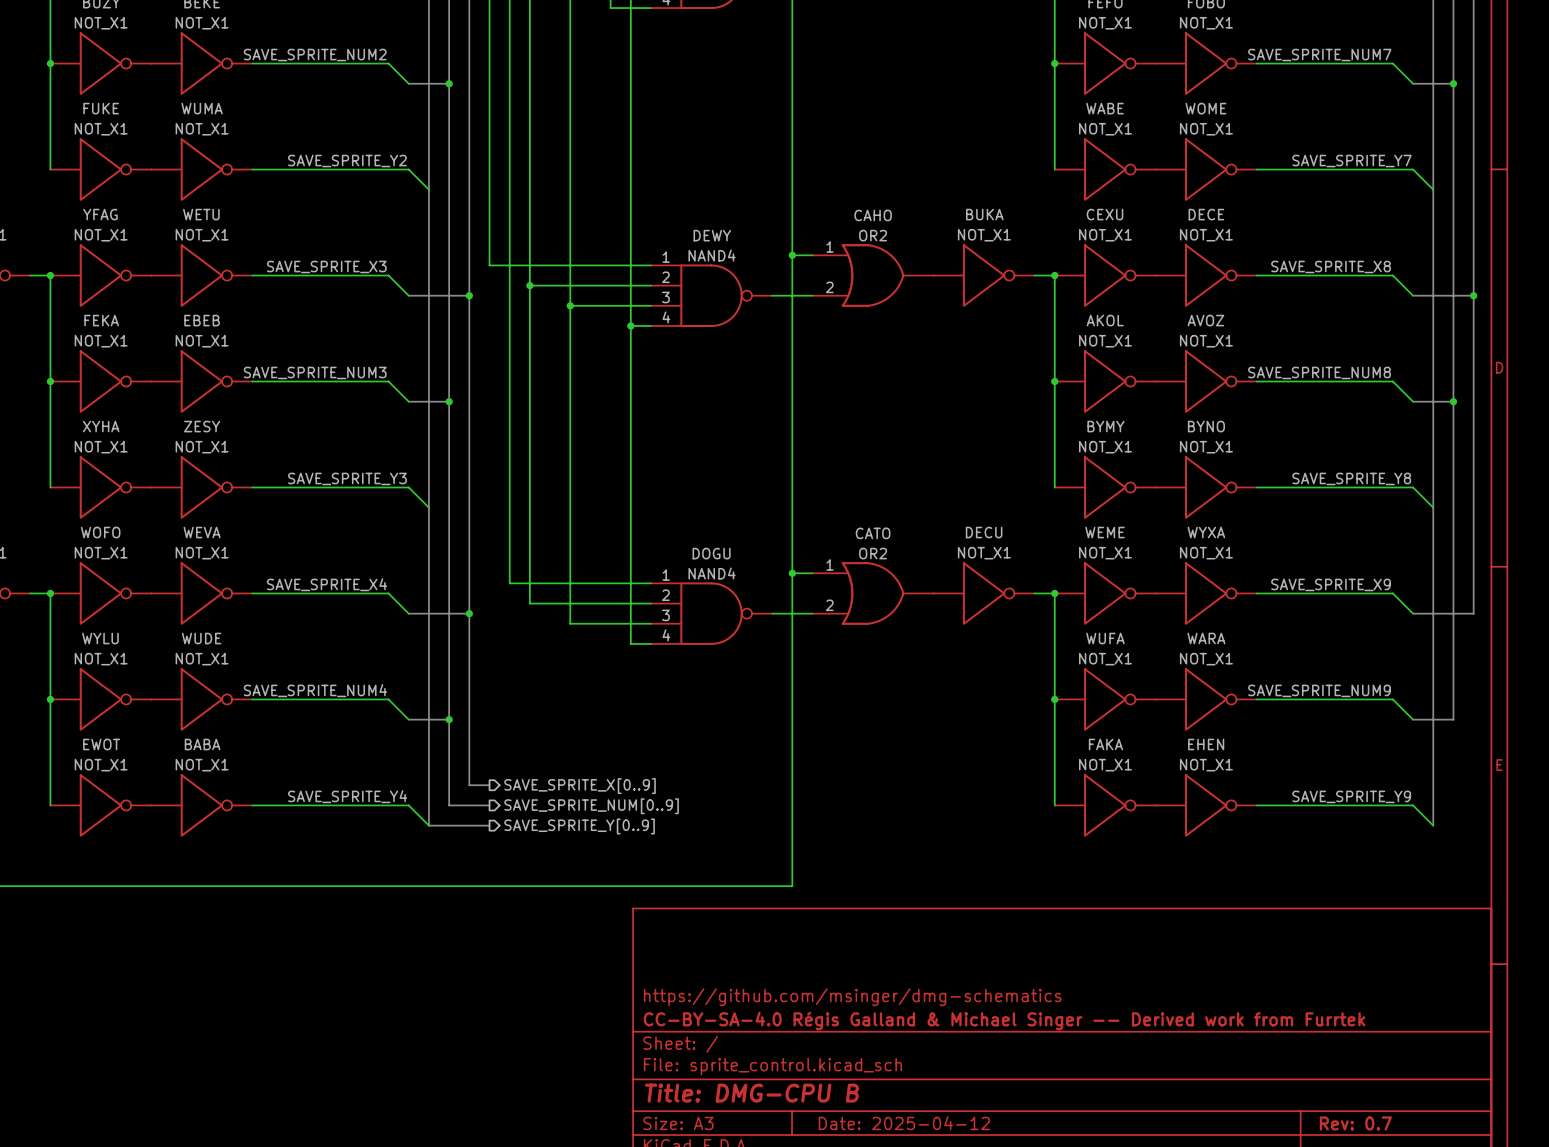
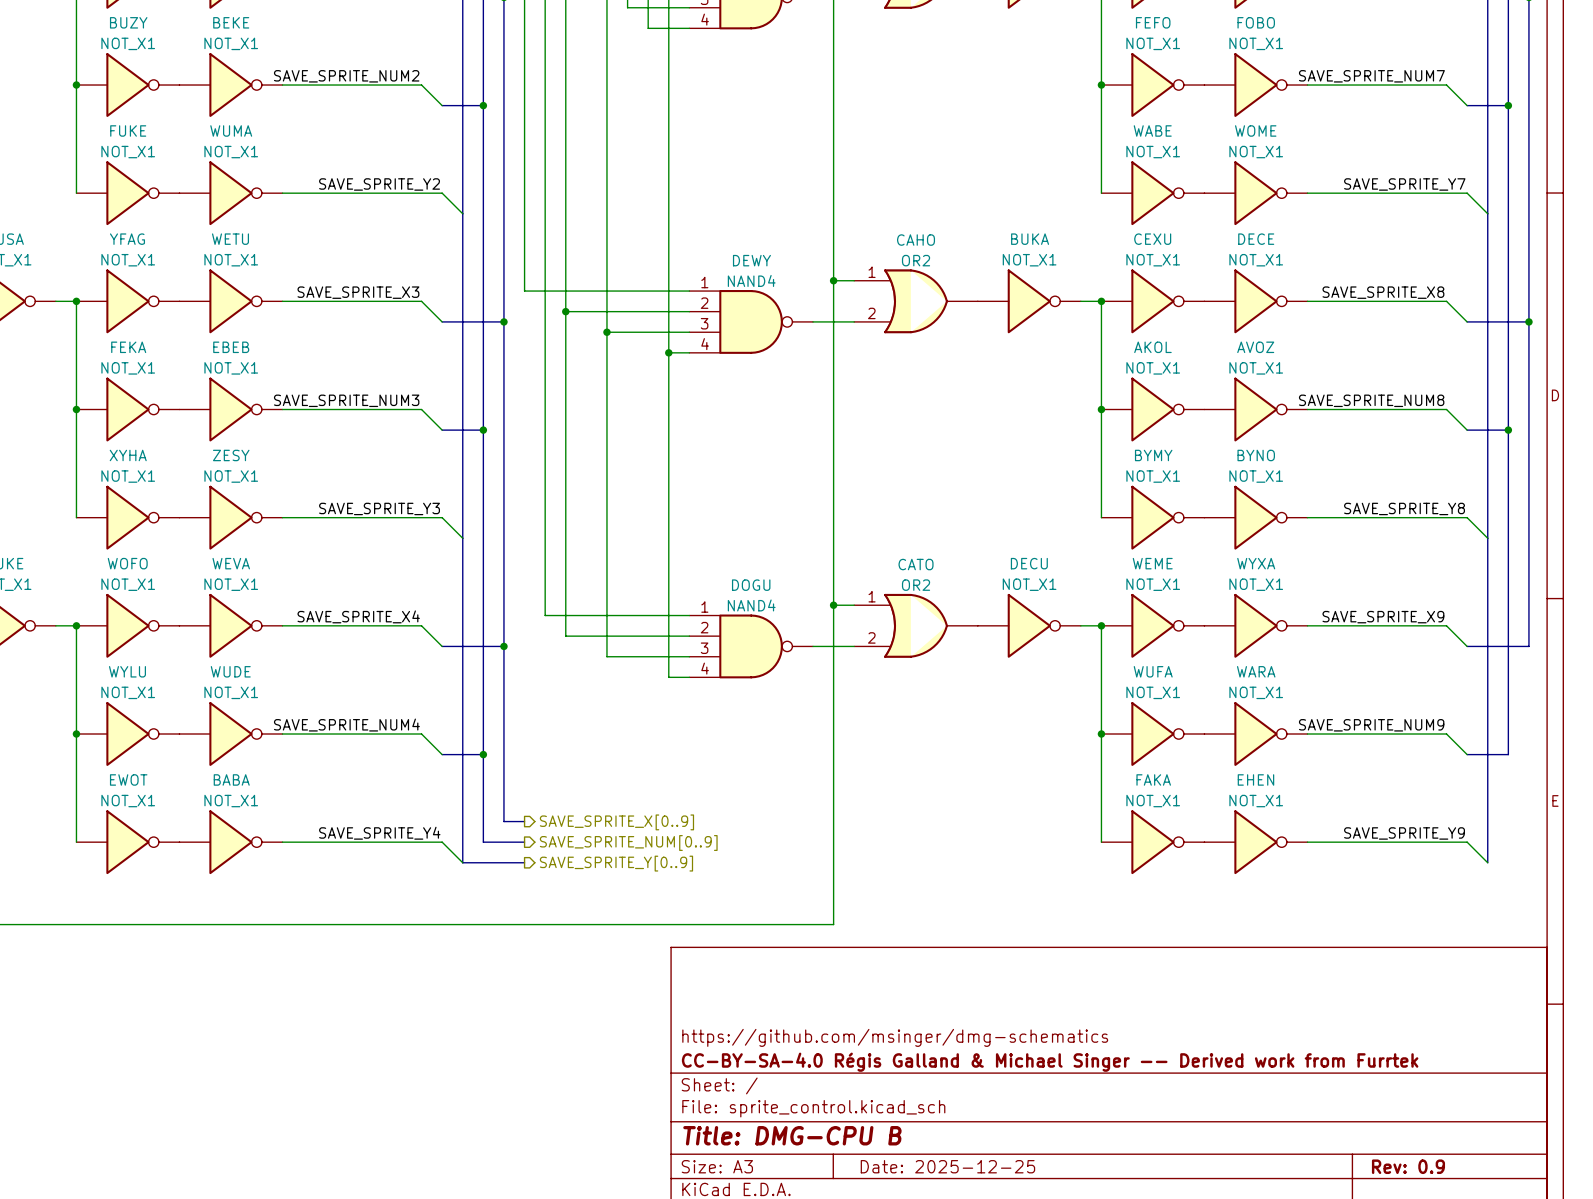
title block: Date: 2025-04-12 (904, 1123) -> Date: 2025-12-25 (947, 1166)
title block: Rev: 0.7 (1355, 1123) -> Rev: 0.9 (1408, 1166)

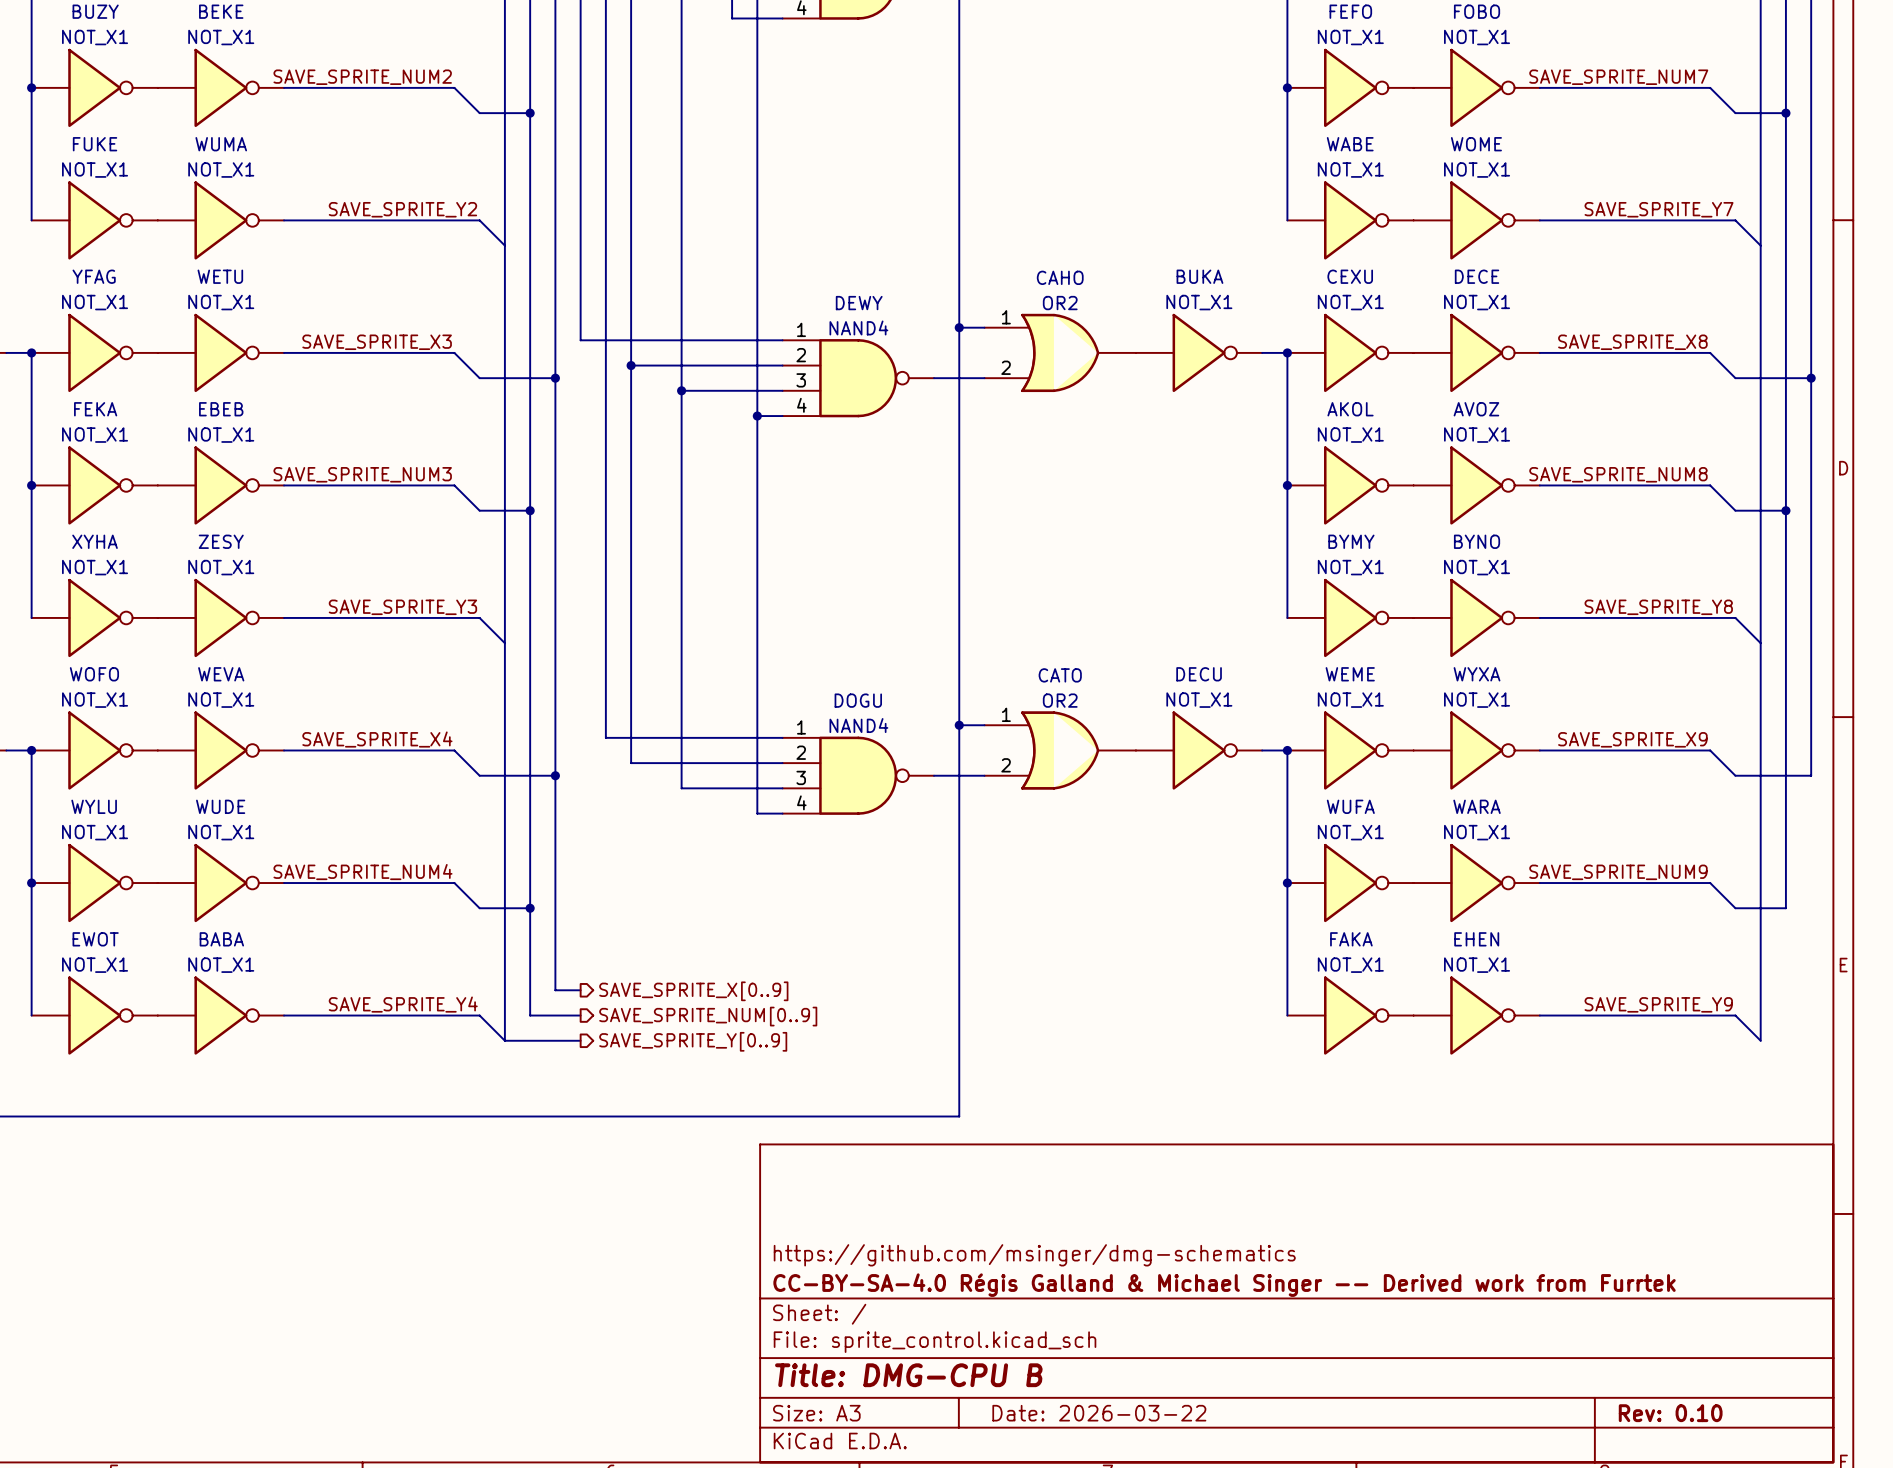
title block: Date: 2025-12-25 (947, 1166) -> Date: 2026-03-22 (1099, 1413)
title block: Rev: 0.9 (1408, 1166) -> Rev: 0.10 (1670, 1413)

